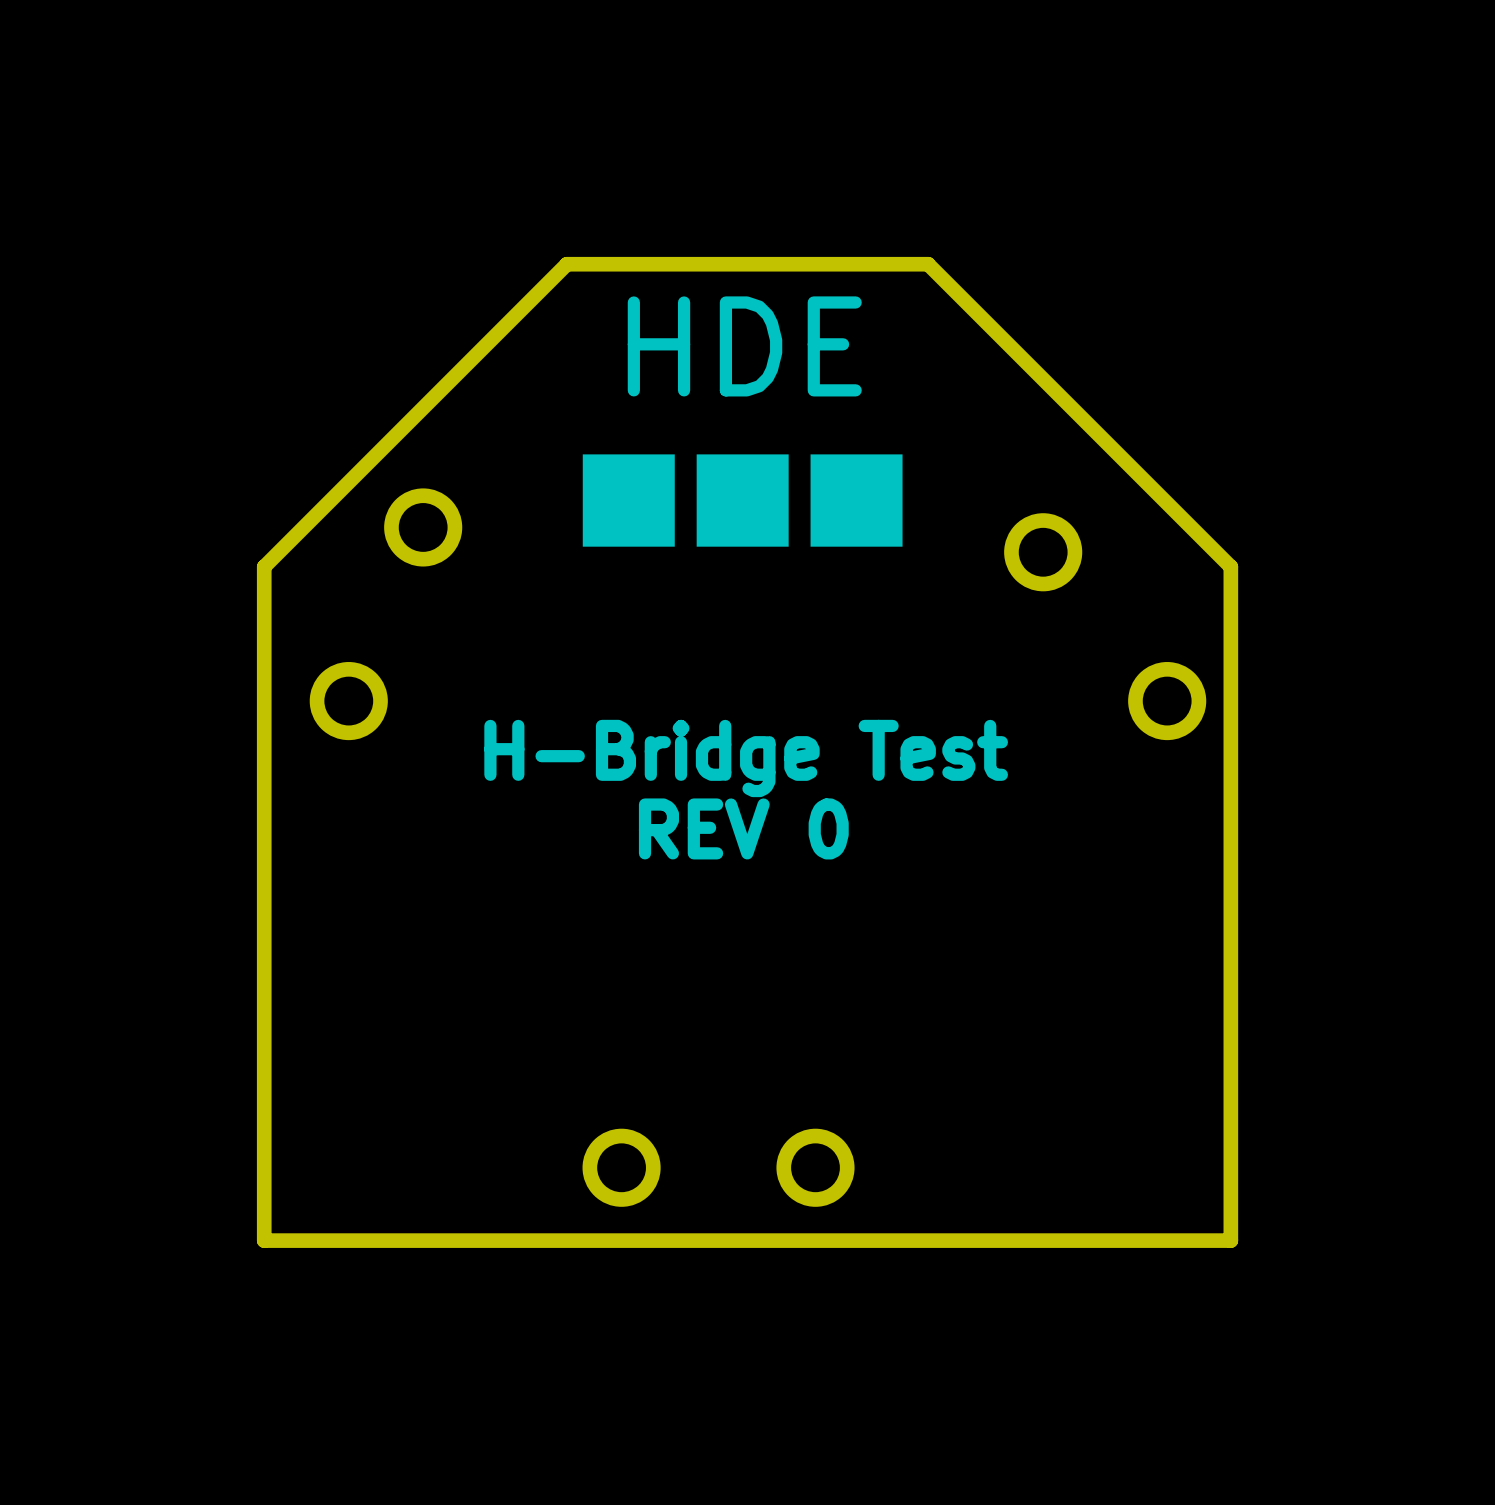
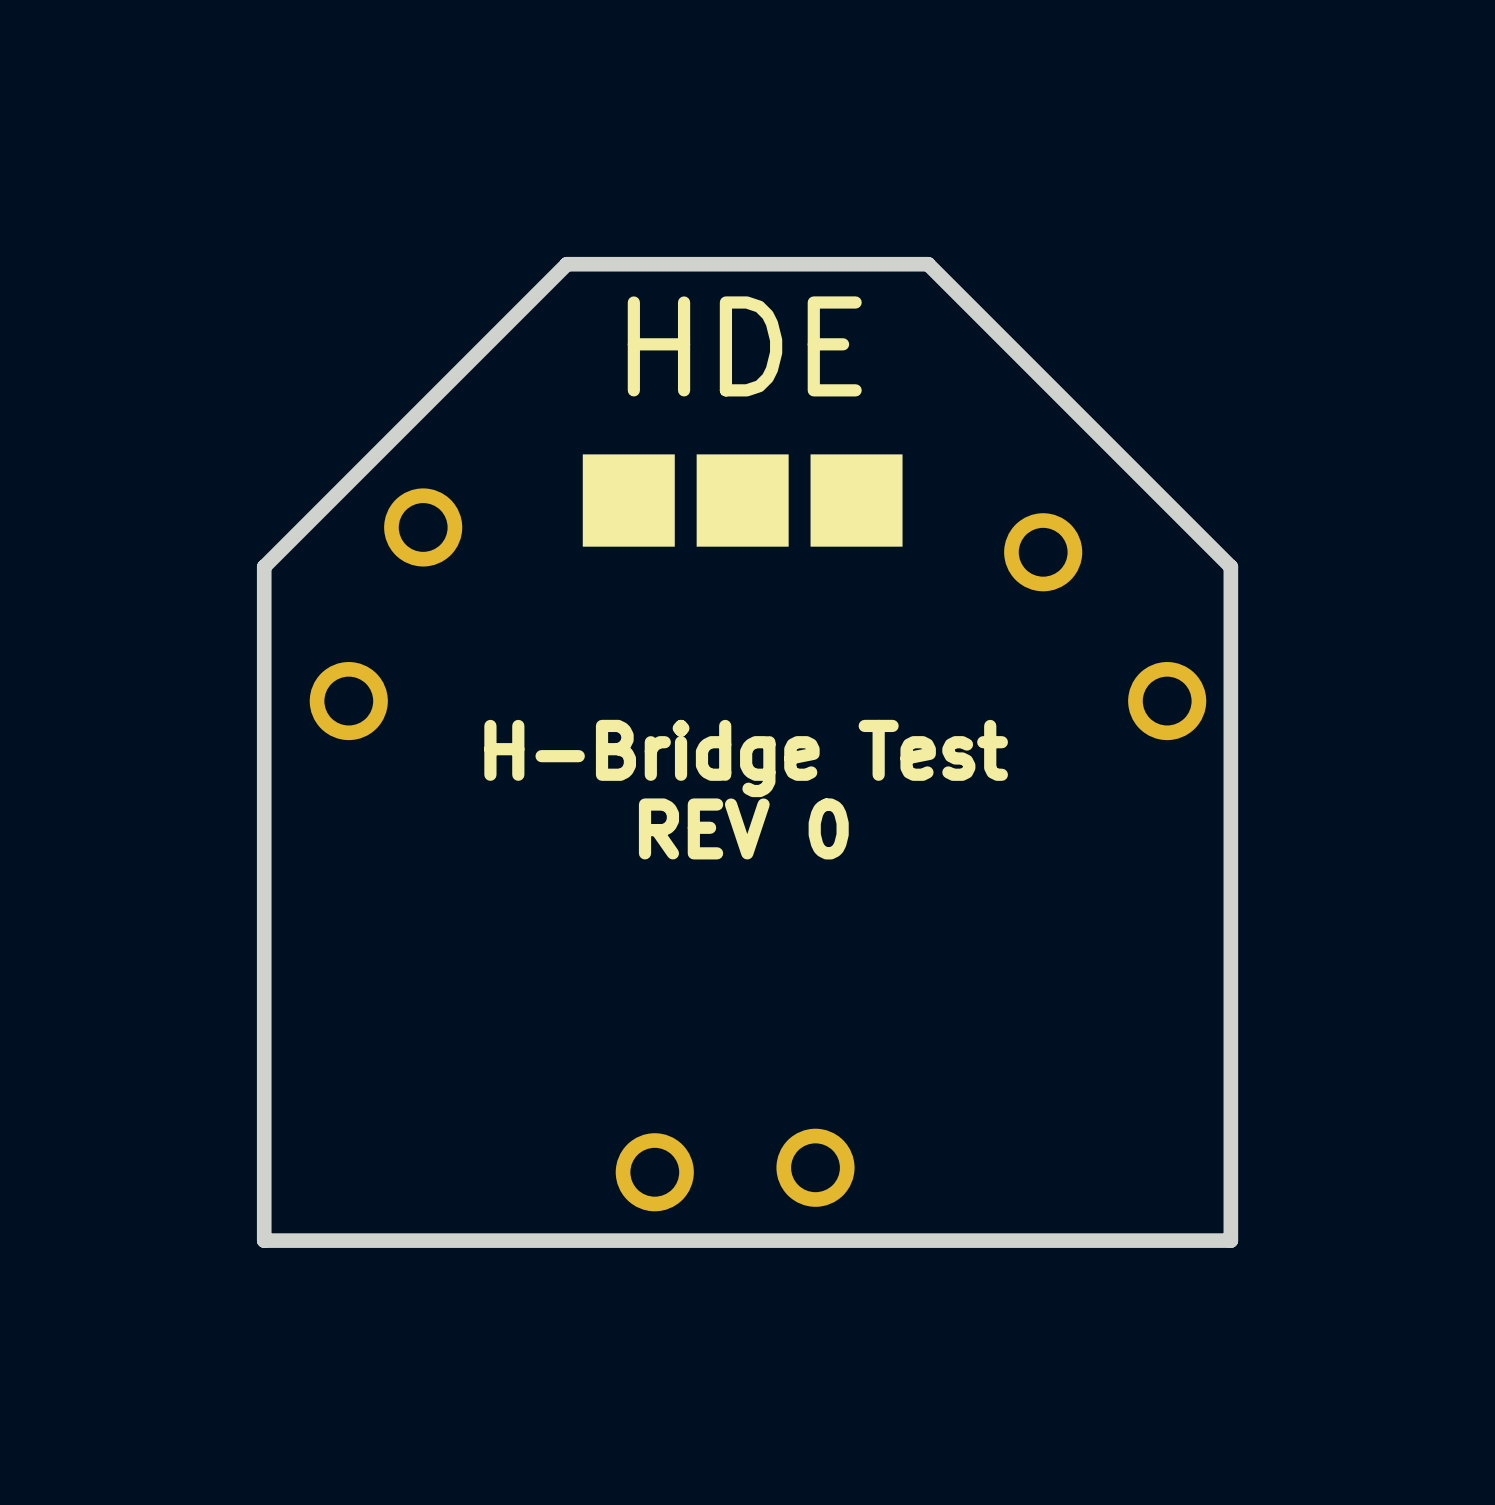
part position: (621, 1167) -> (654, 1172)

